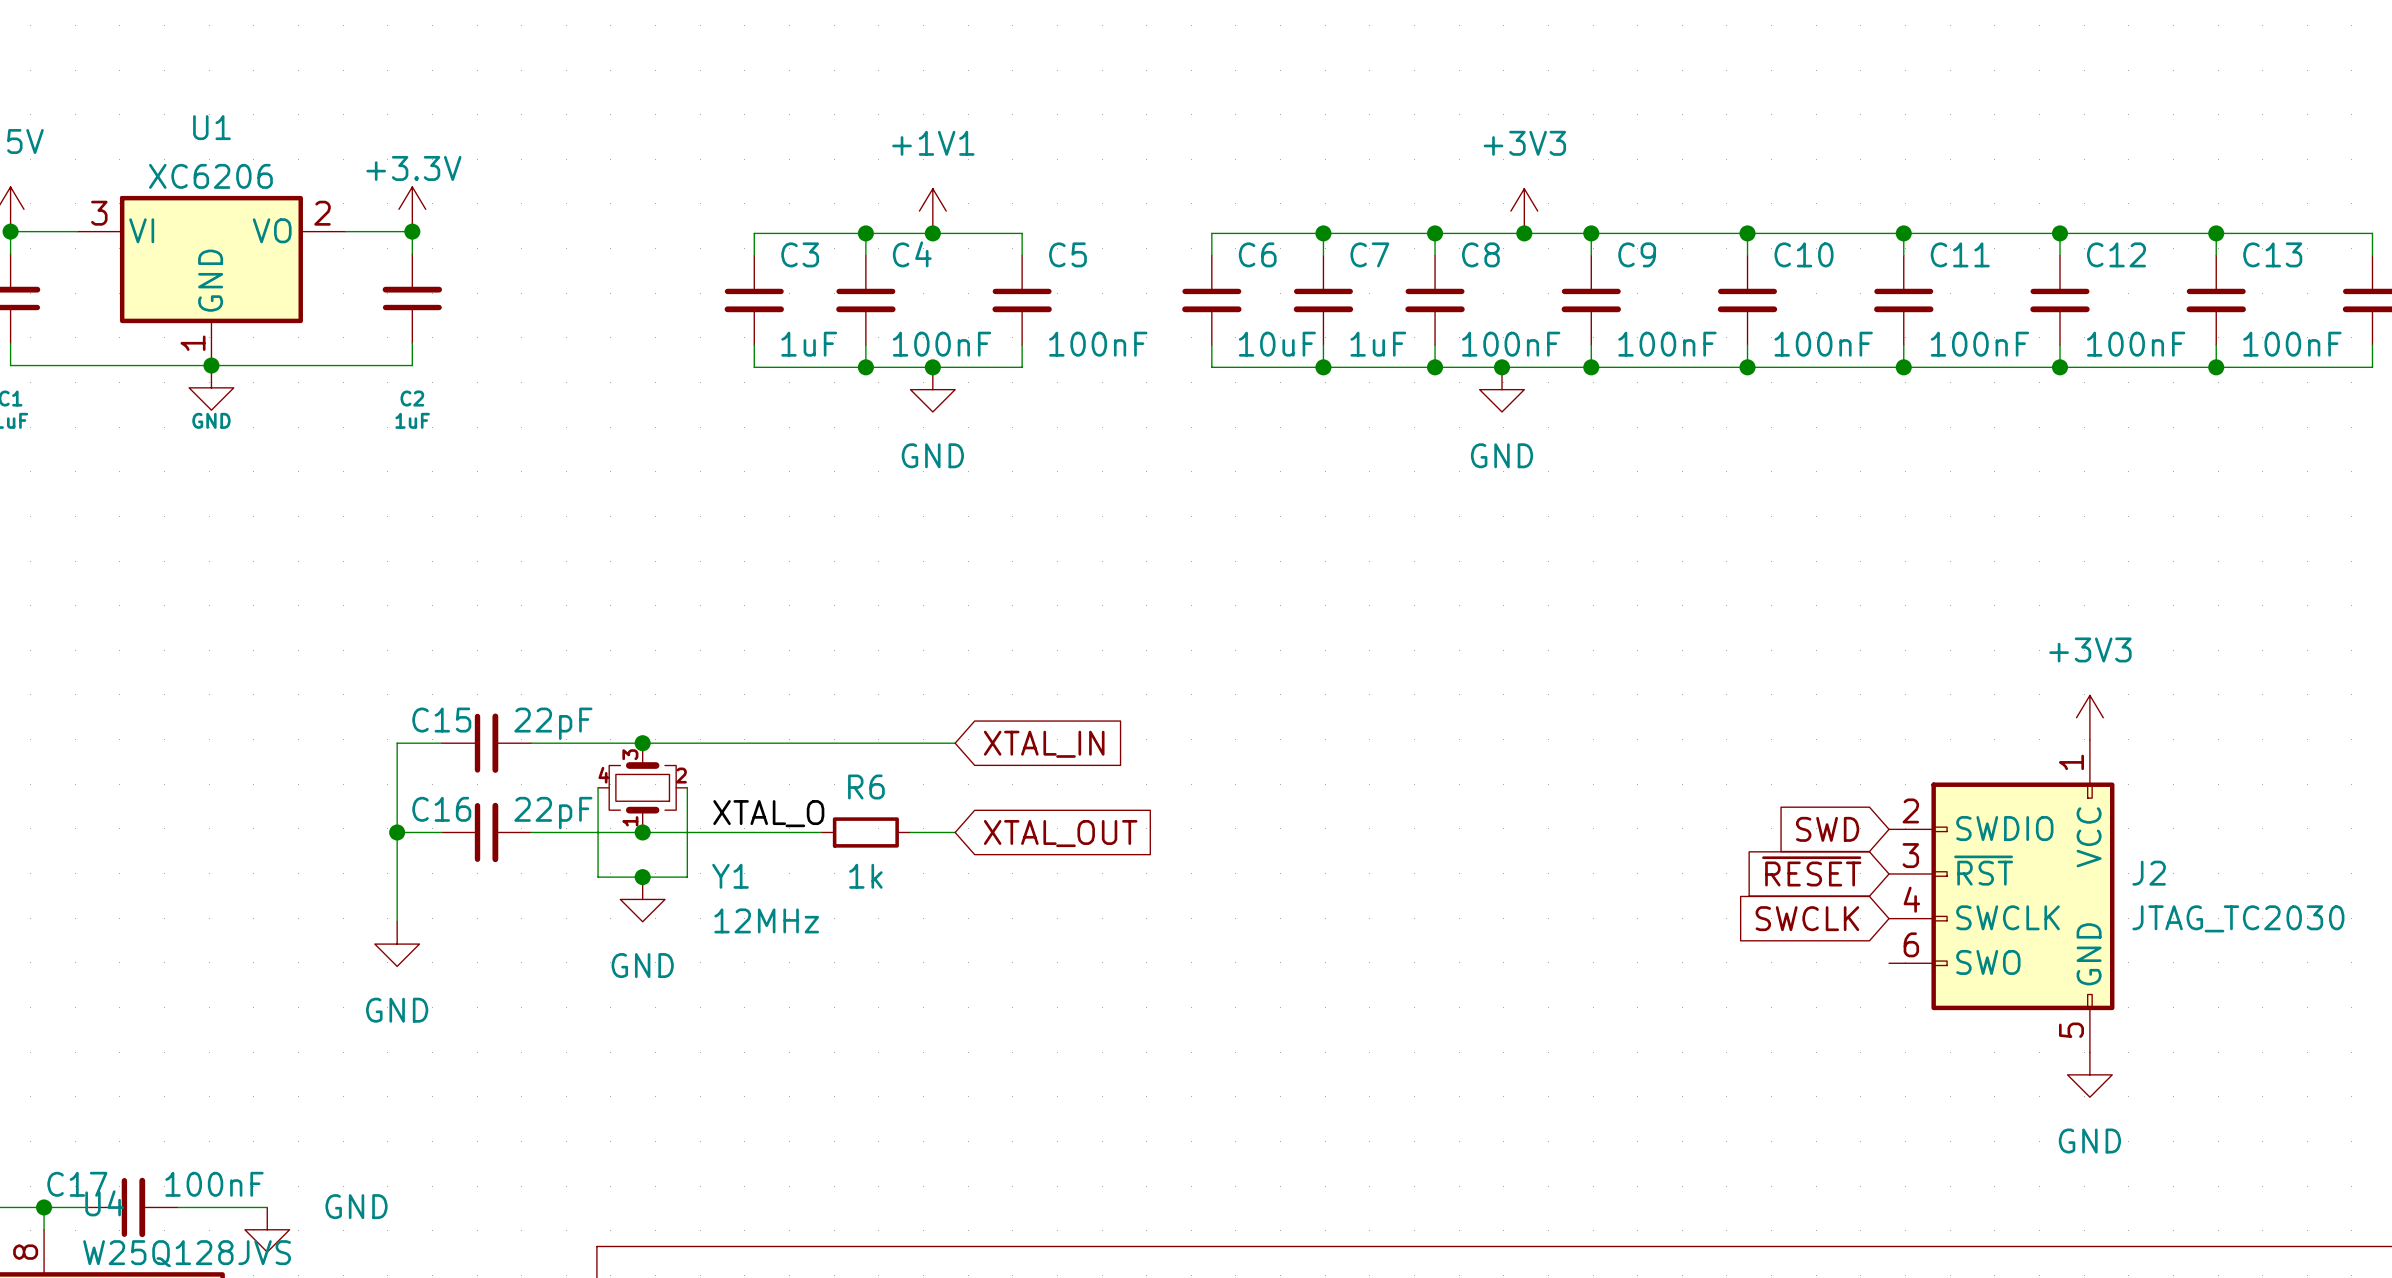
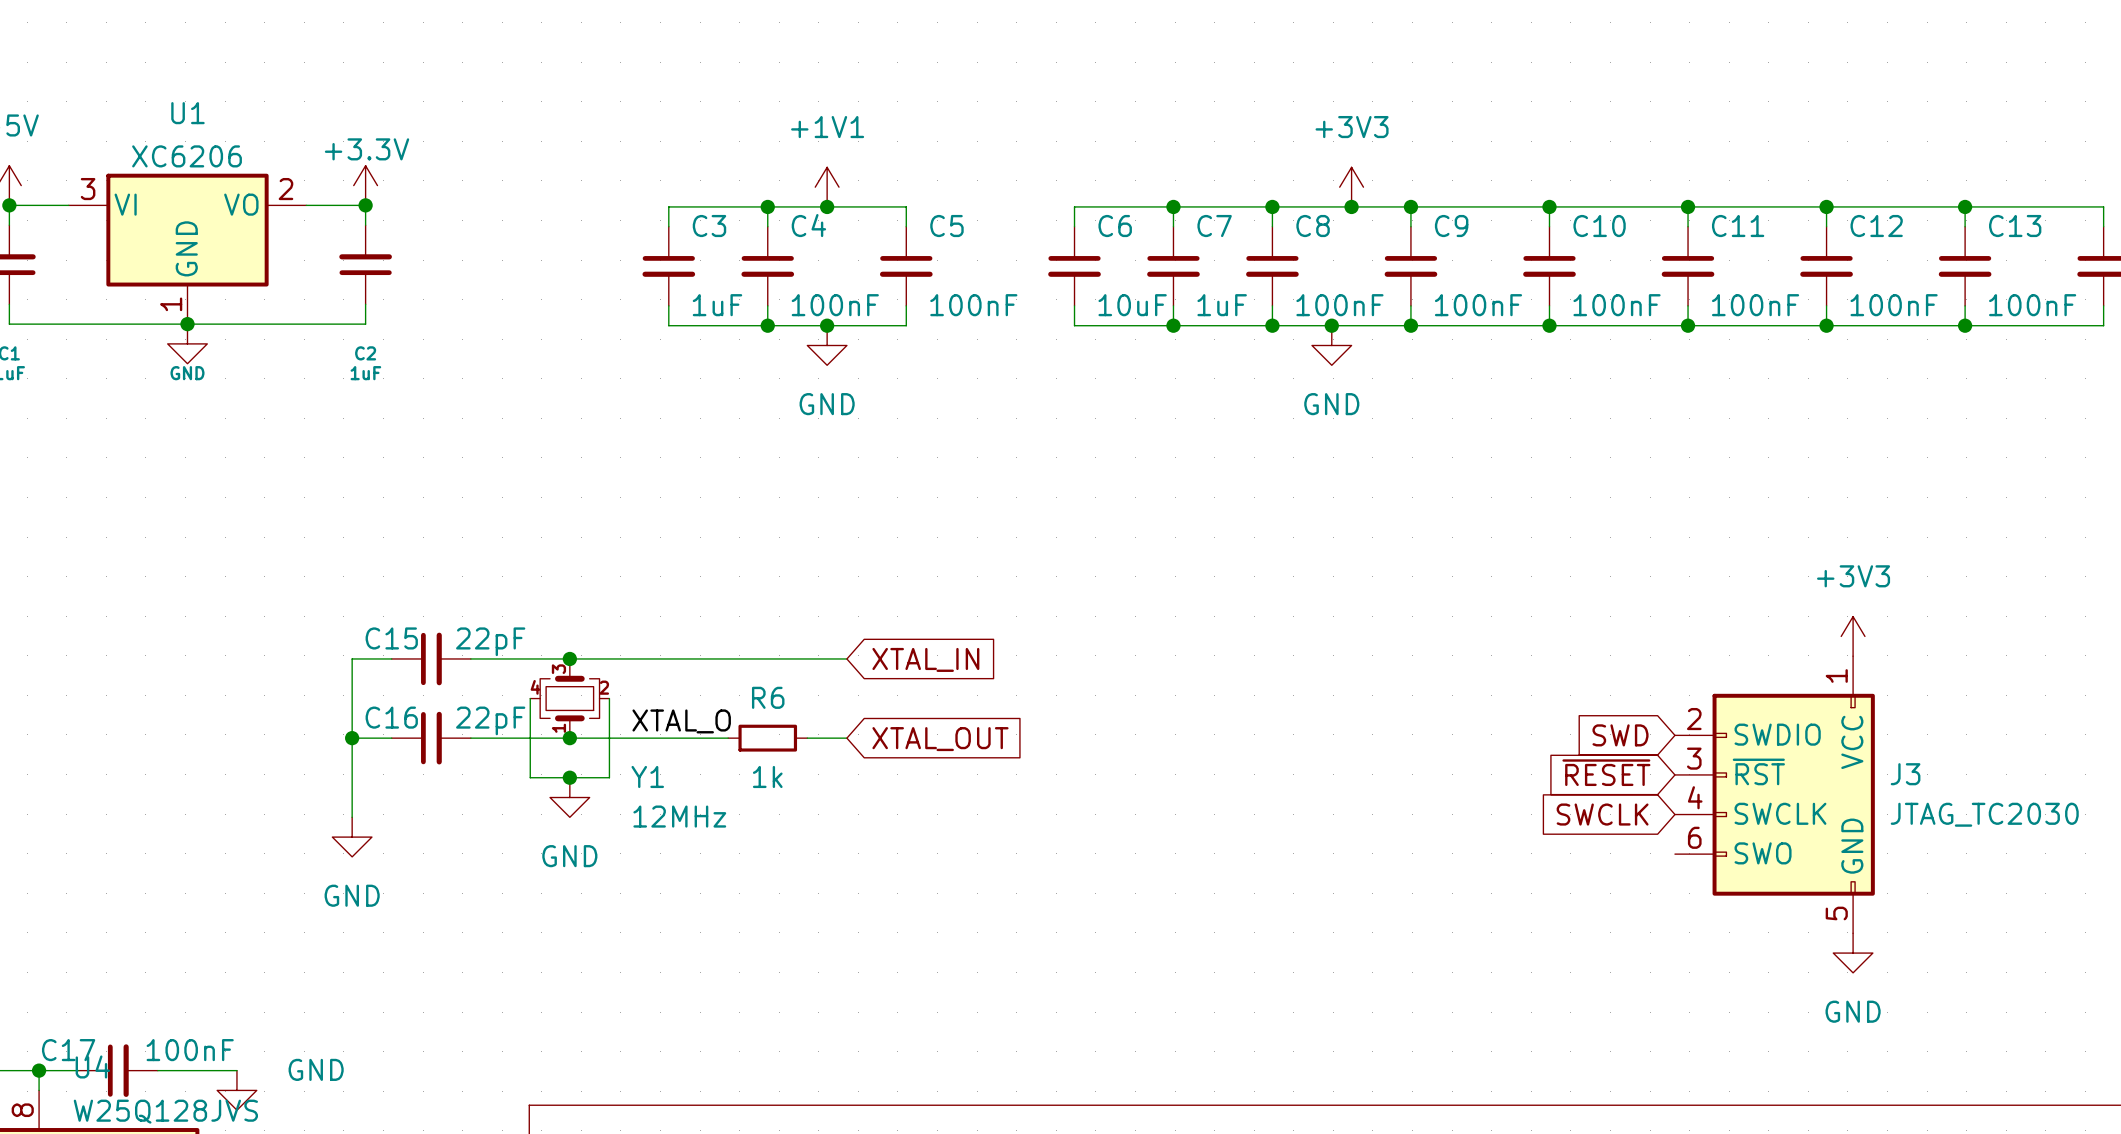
J2 name: J2 (2149, 873) -> J3 (1905, 774)

